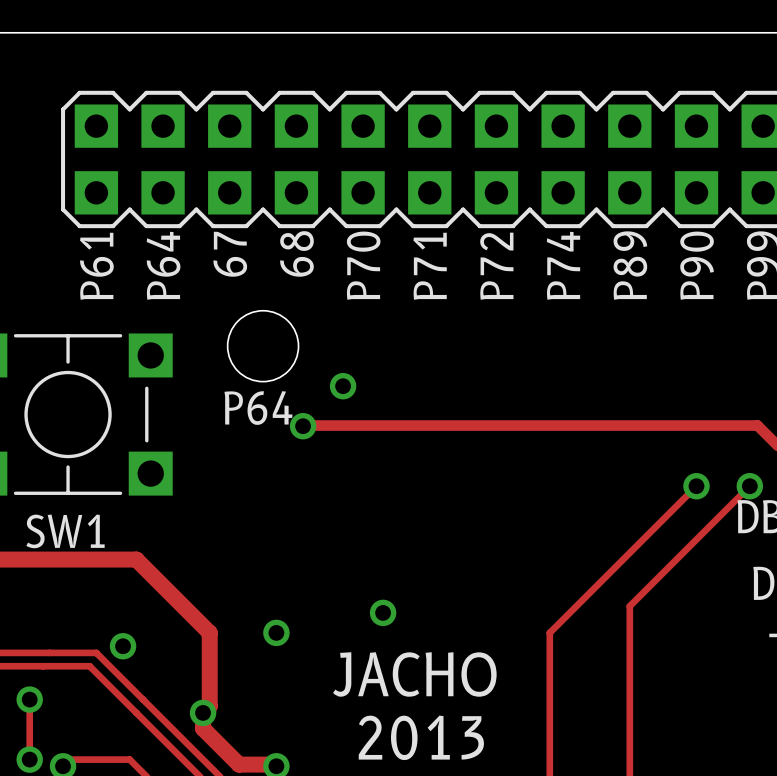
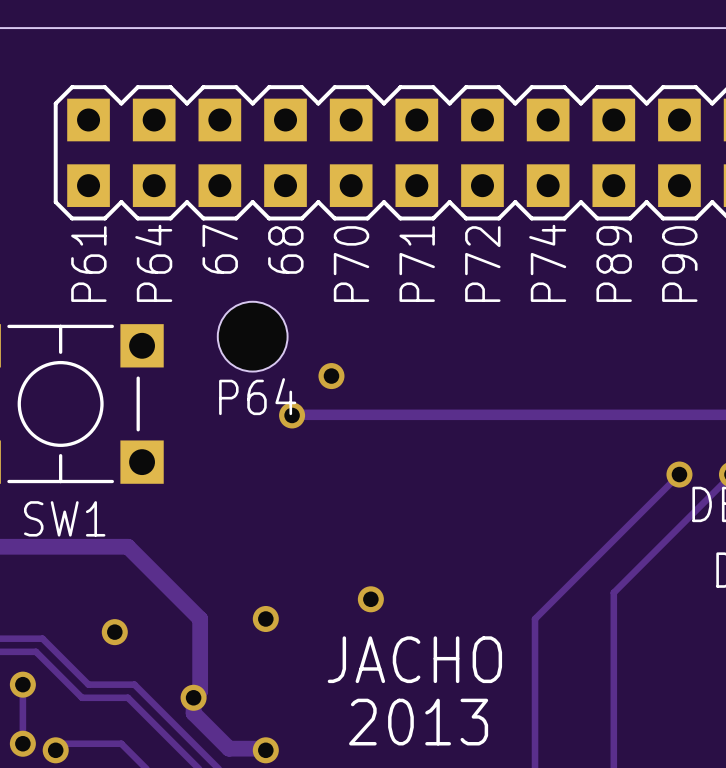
track: (49, 652) (96, 652) (143, 699) -> (42, 638) (88, 684) (134, 684)
track: (43, 666) (89, 666) (136, 712) -> (36, 651) (81, 697) (127, 697)

